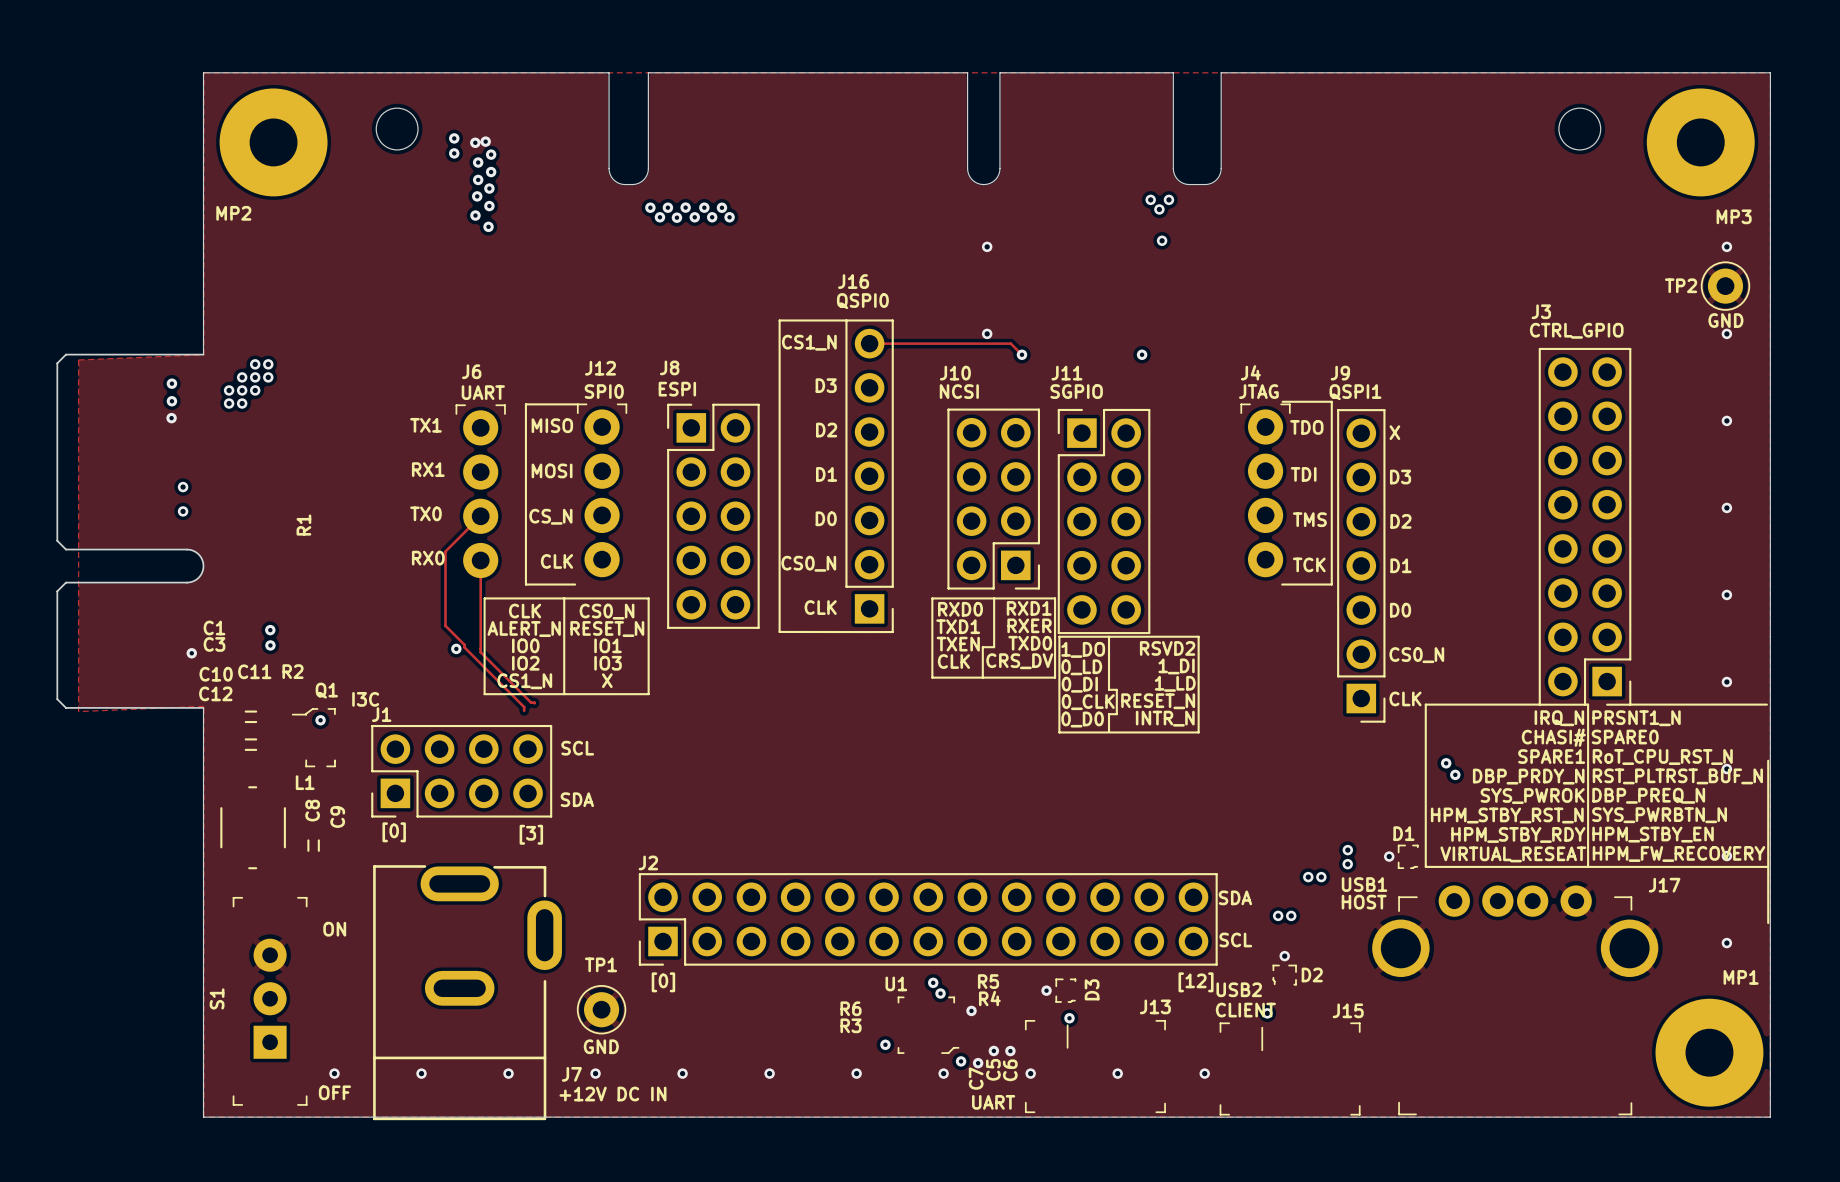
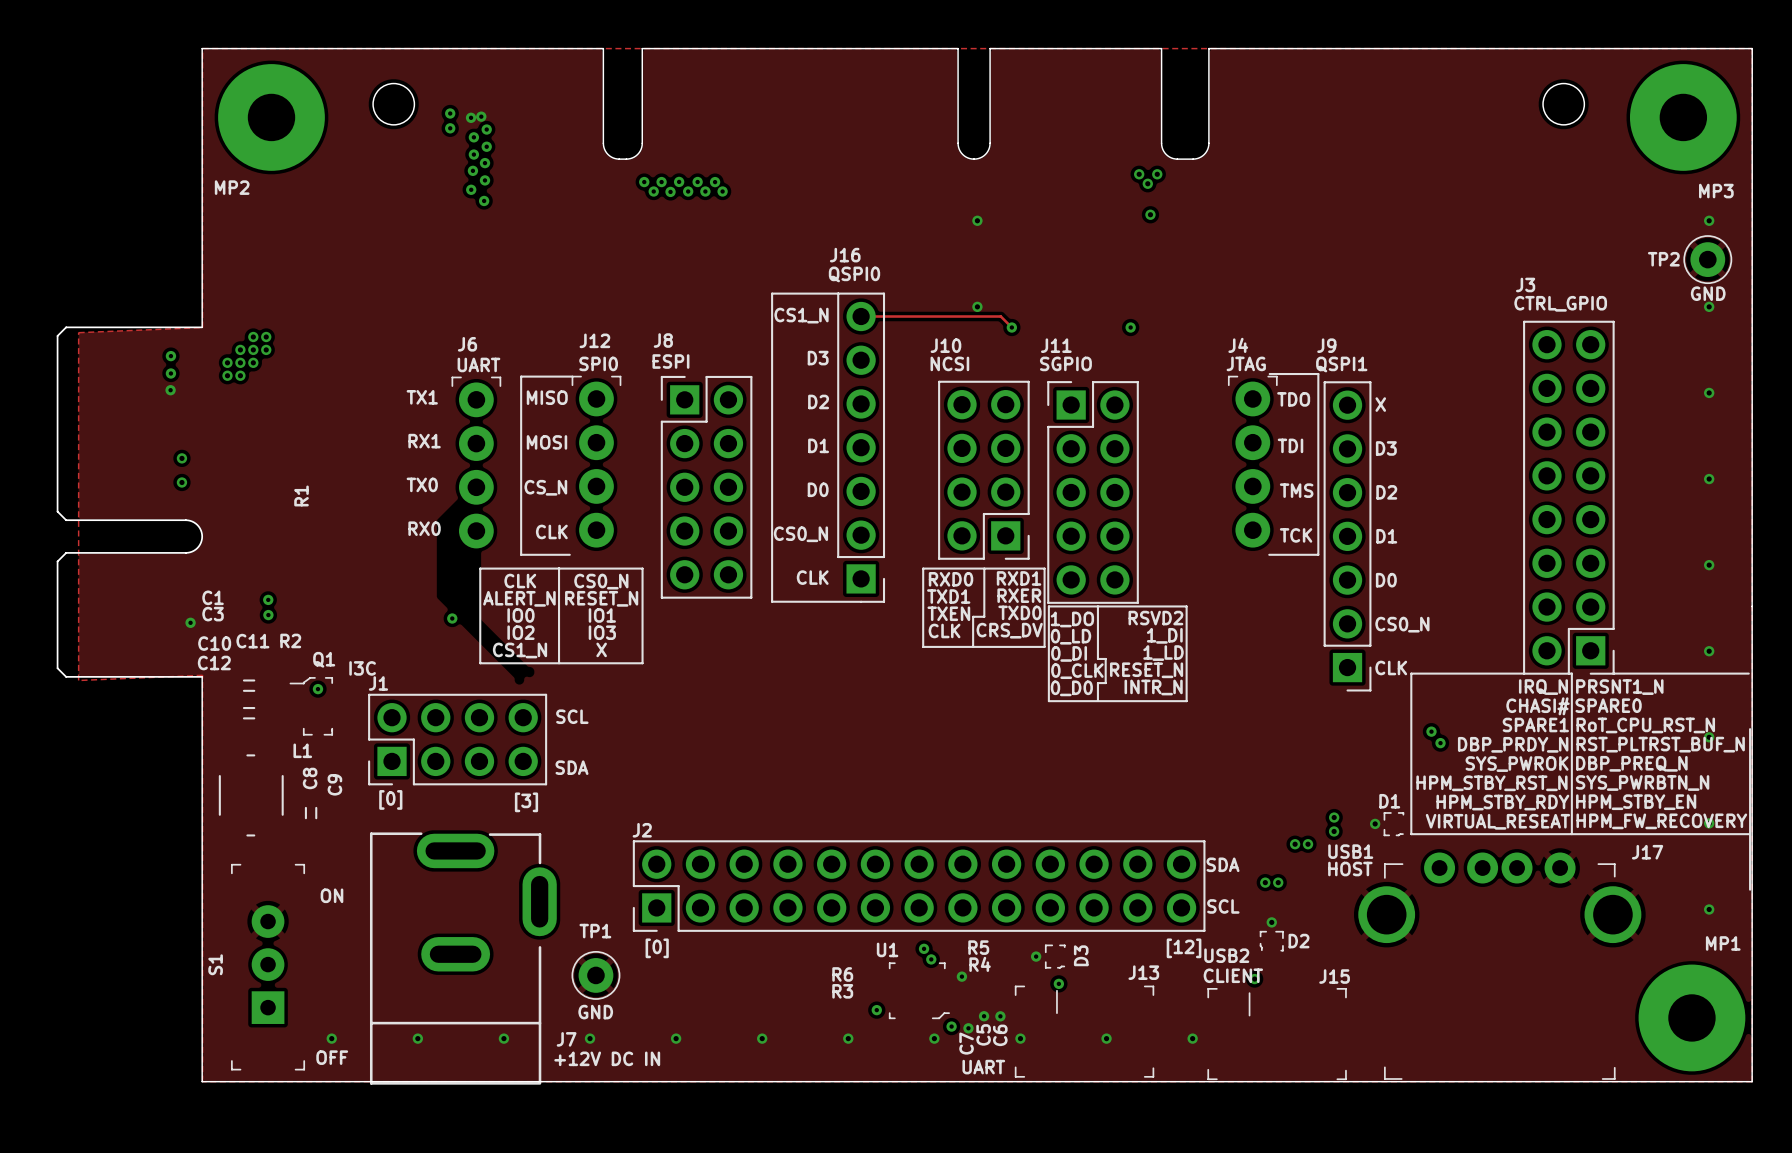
track: (480, 516) (445, 551) (445, 625) (524, 707) (524, 710) -> none
track: (480, 560) (480, 652) (531, 702) (534, 703) -> none

